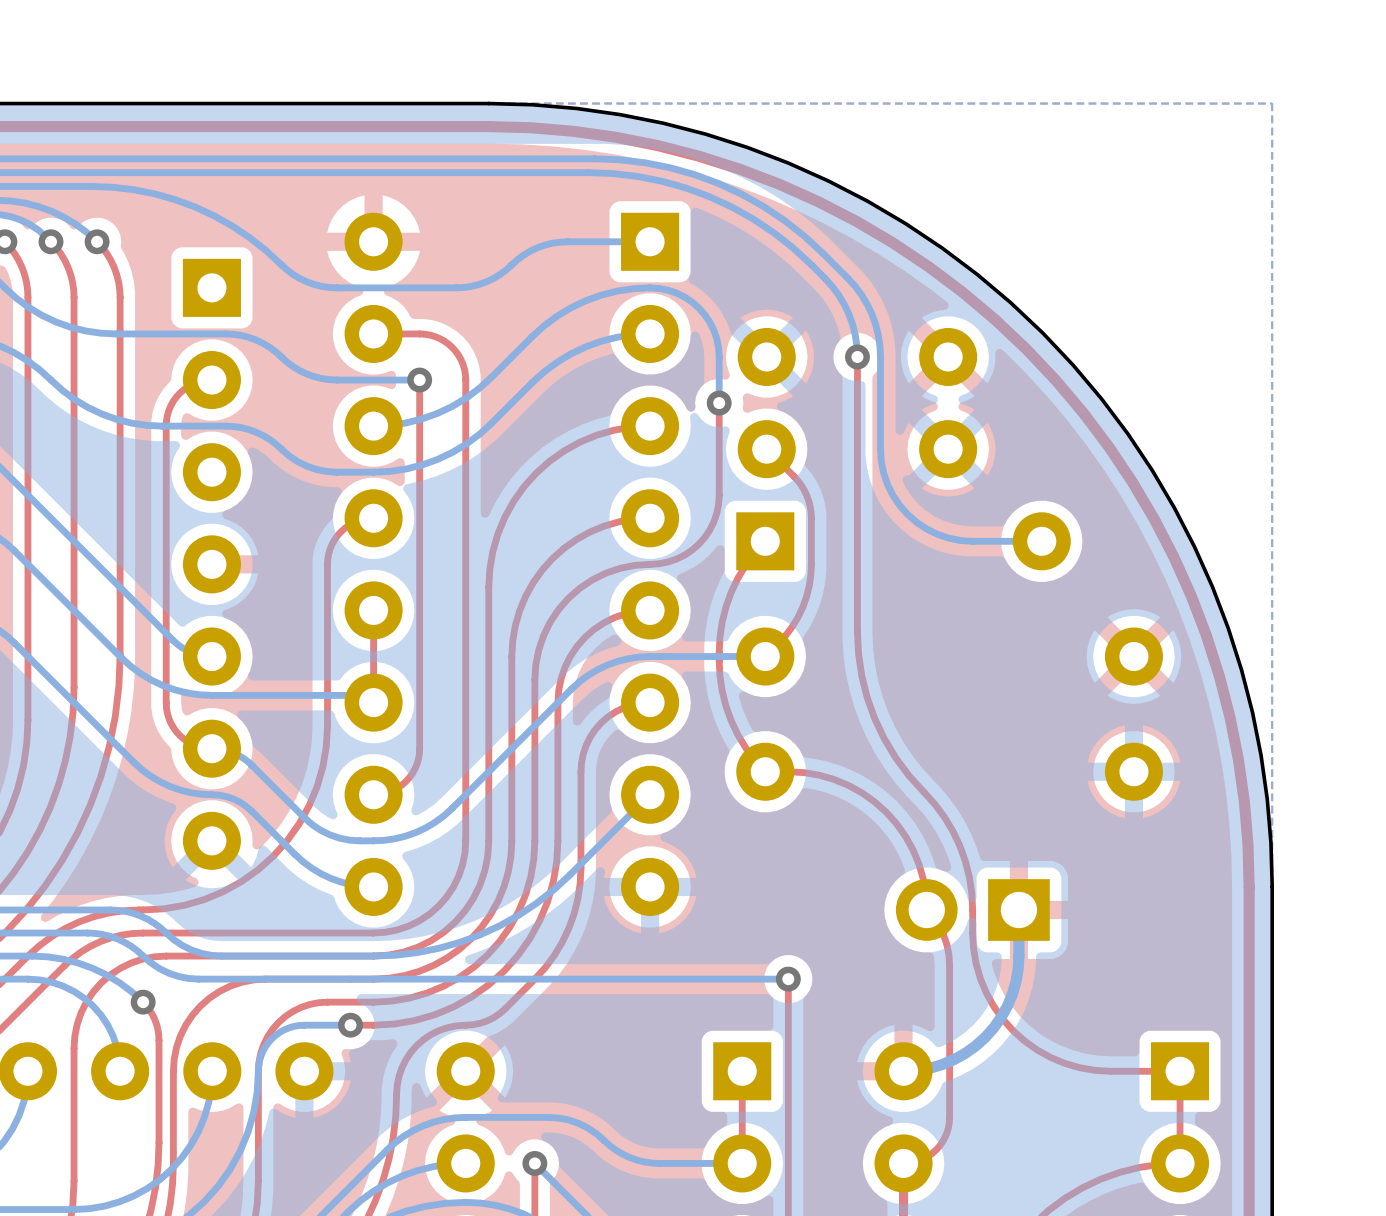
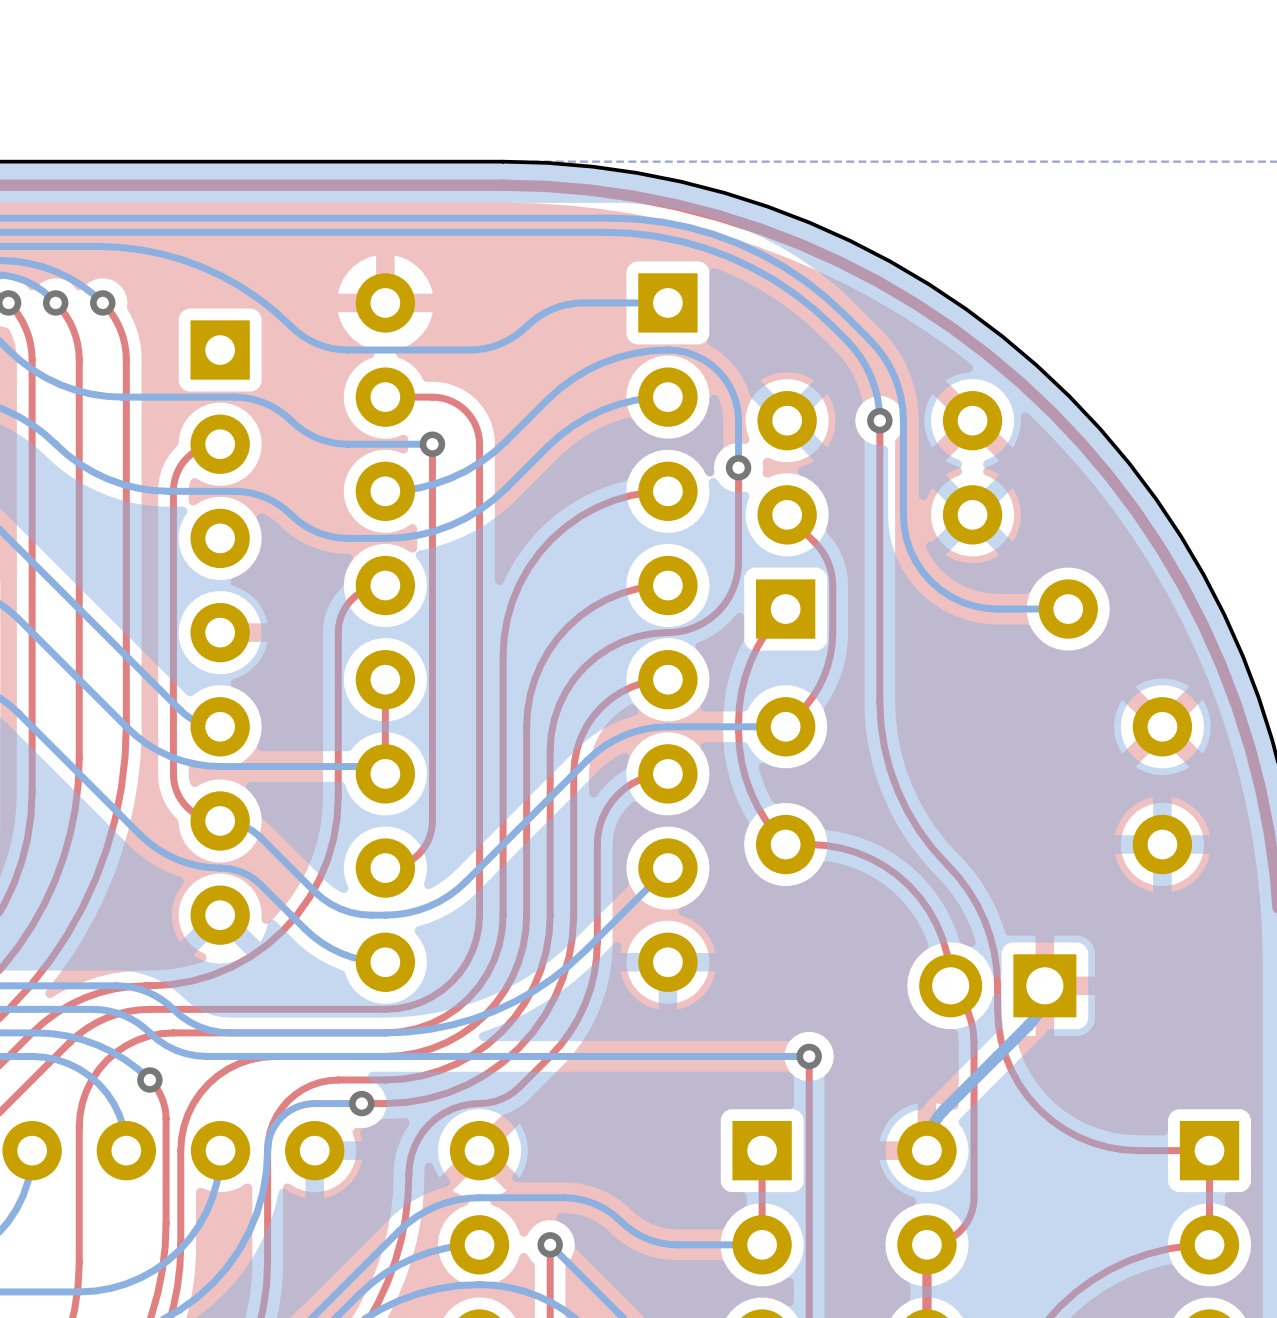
bottom track: (1018, 909) (1018, 955) (1016, 981) (1007, 1005) (993, 1027) (975, 1046) (953, 1059) (929, 1068) (903, 1071) -> (1044, 985) (1042, 1000) (1033, 1020) (938, 1116) (928, 1135) (926, 1150)

